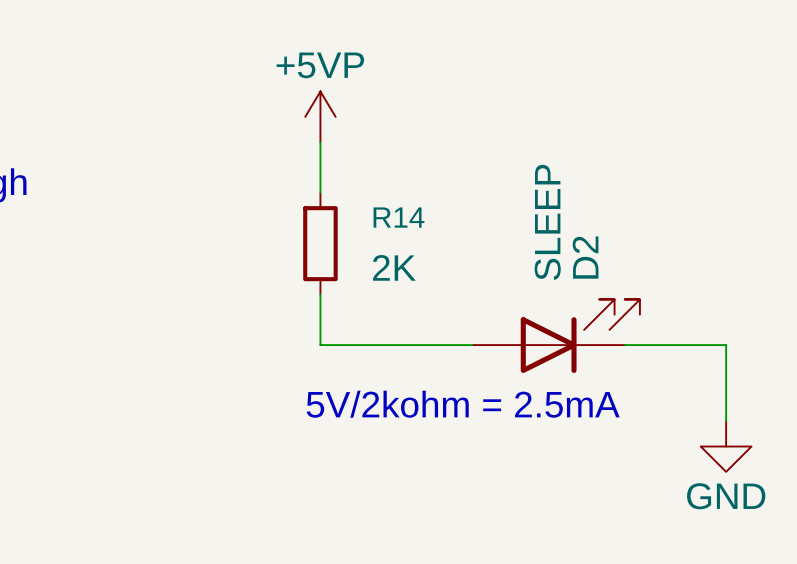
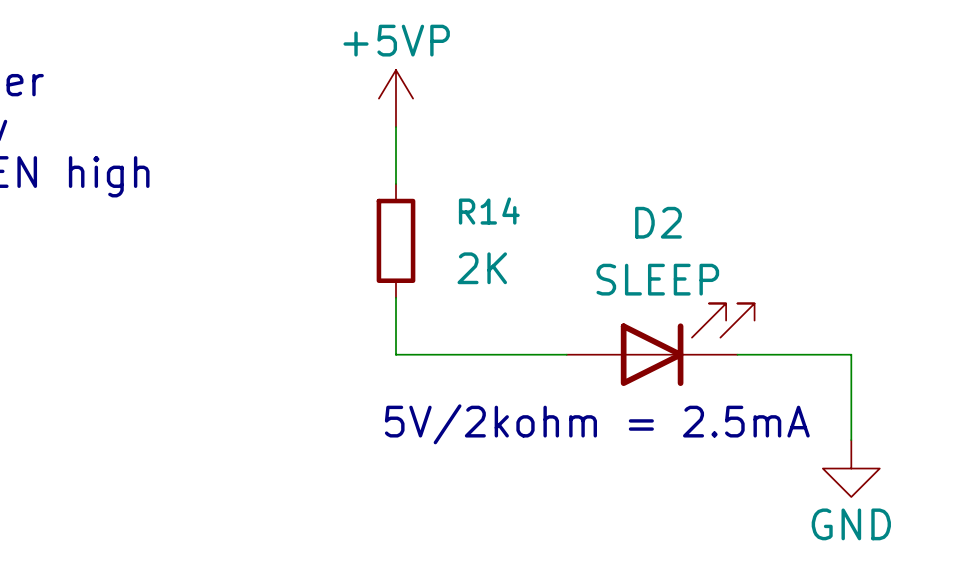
D2 value rotation: 0° (547, 222) -> 90° clockwise (657, 279)
D2 name rotation: 0° (585, 257) -> 90° clockwise (658, 222)

